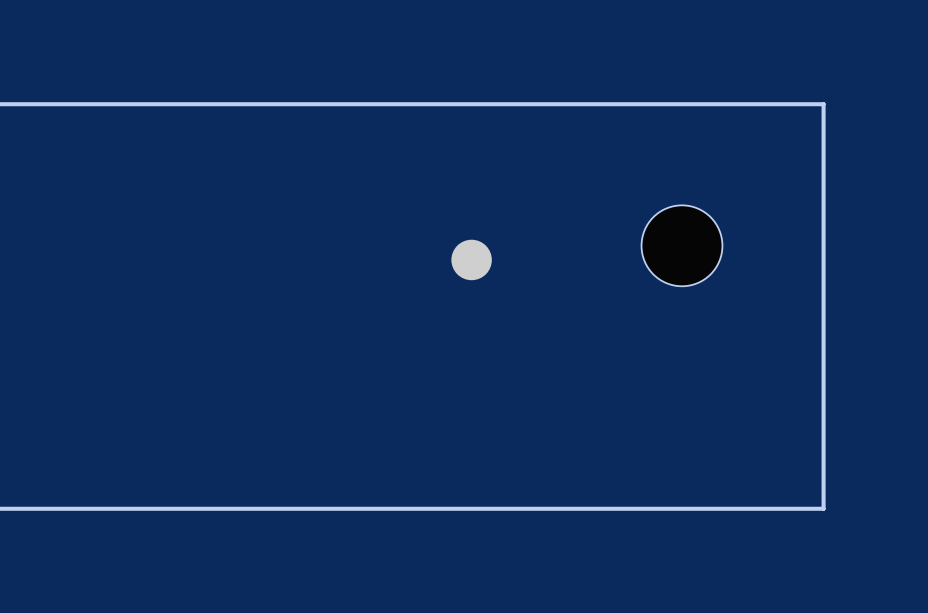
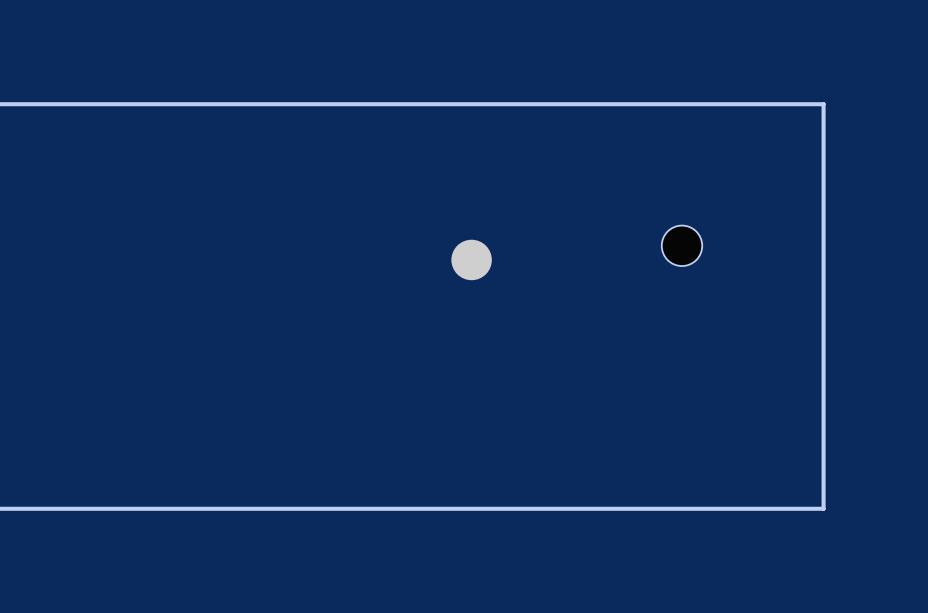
part footprint: [641, 205, 723, 287] -> [661, 225, 703, 267]

